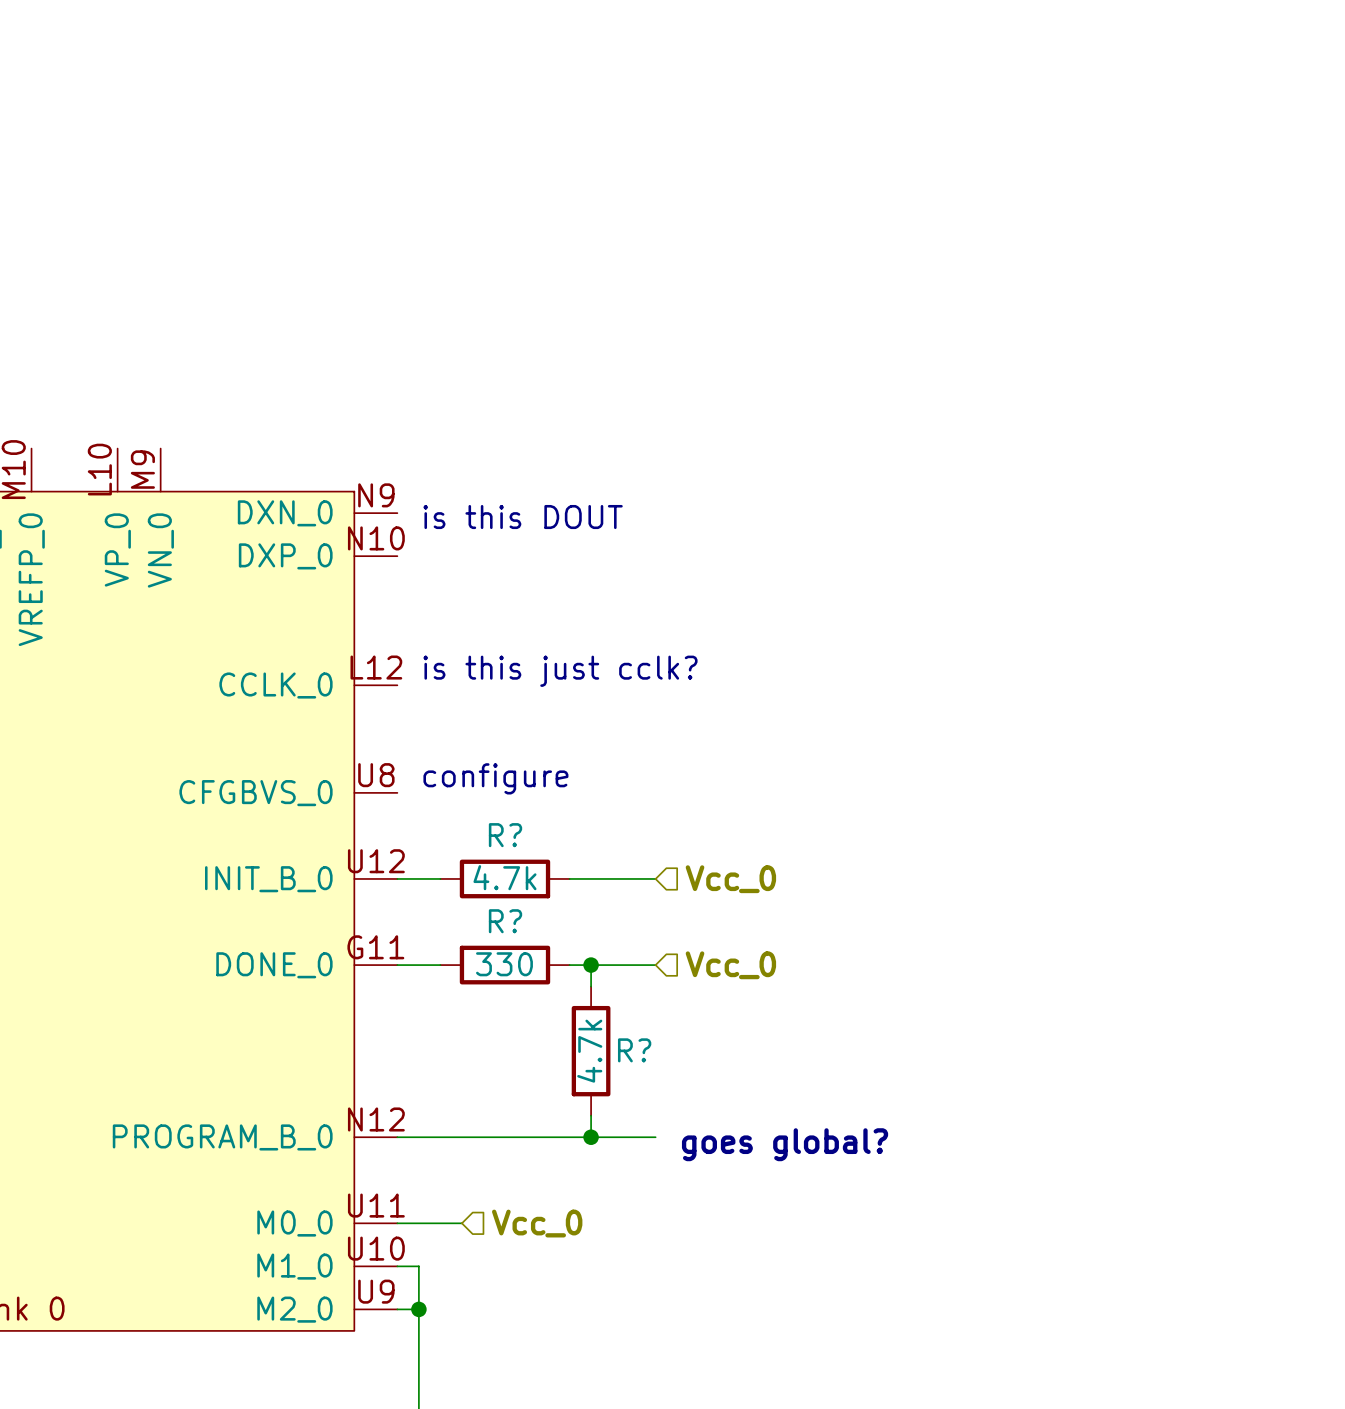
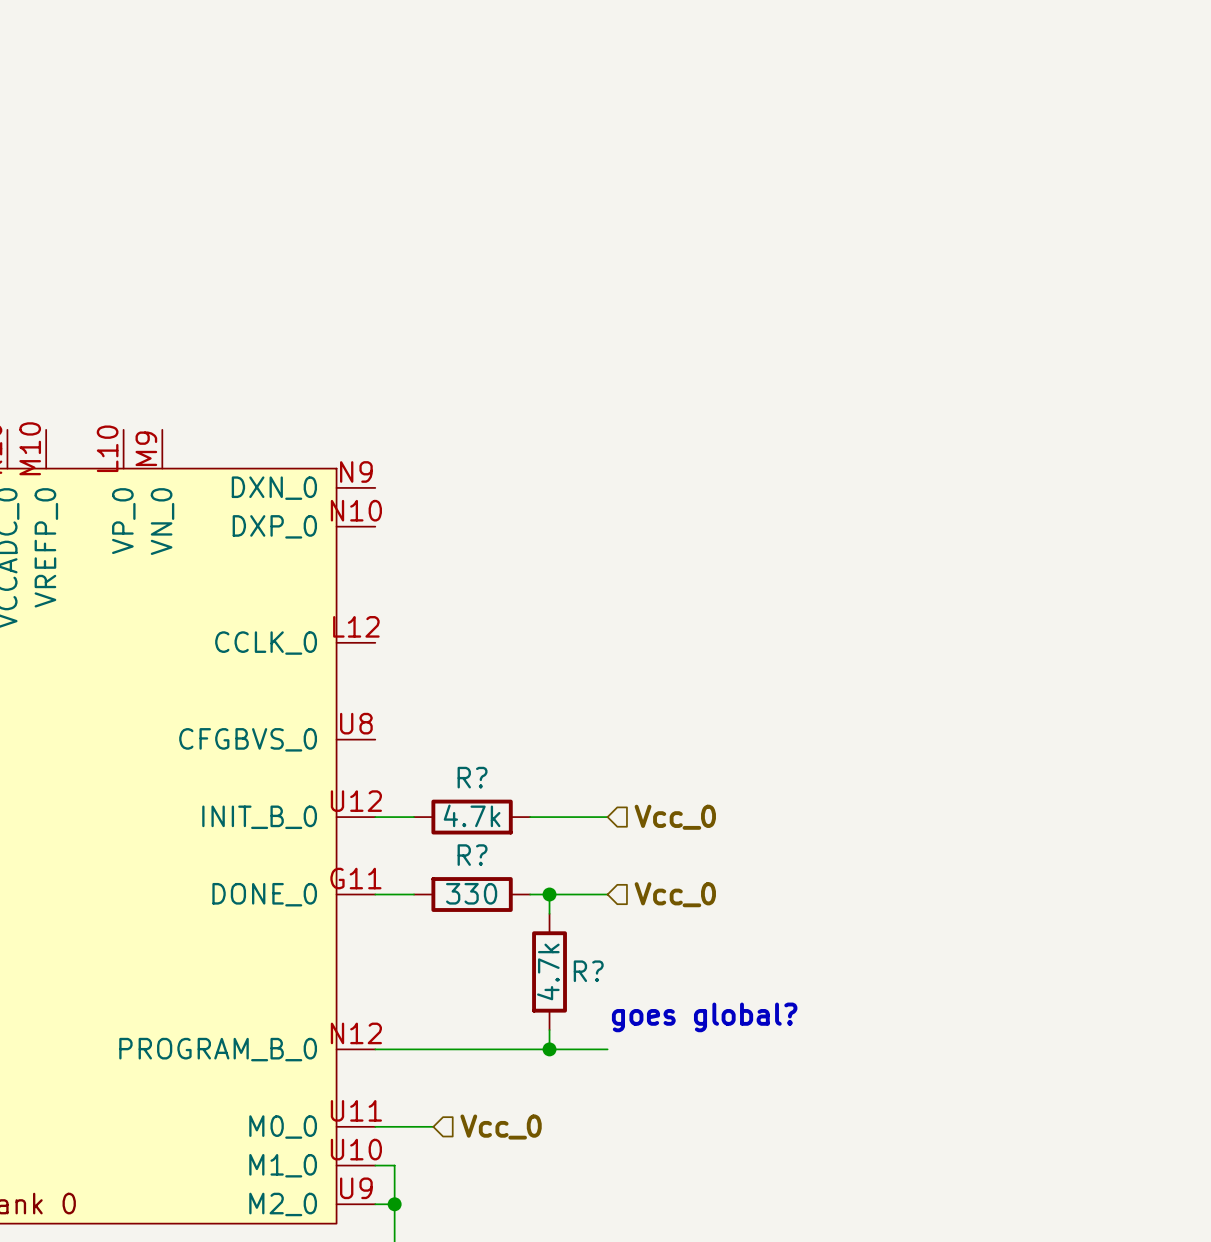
text: is this DOUT (523, 517) -> none
text: is this just cclk? (560, 671) -> none
text: configure (495, 778) -> none
text position: goes global? (785, 1144) -> goes global? (704, 1017)

